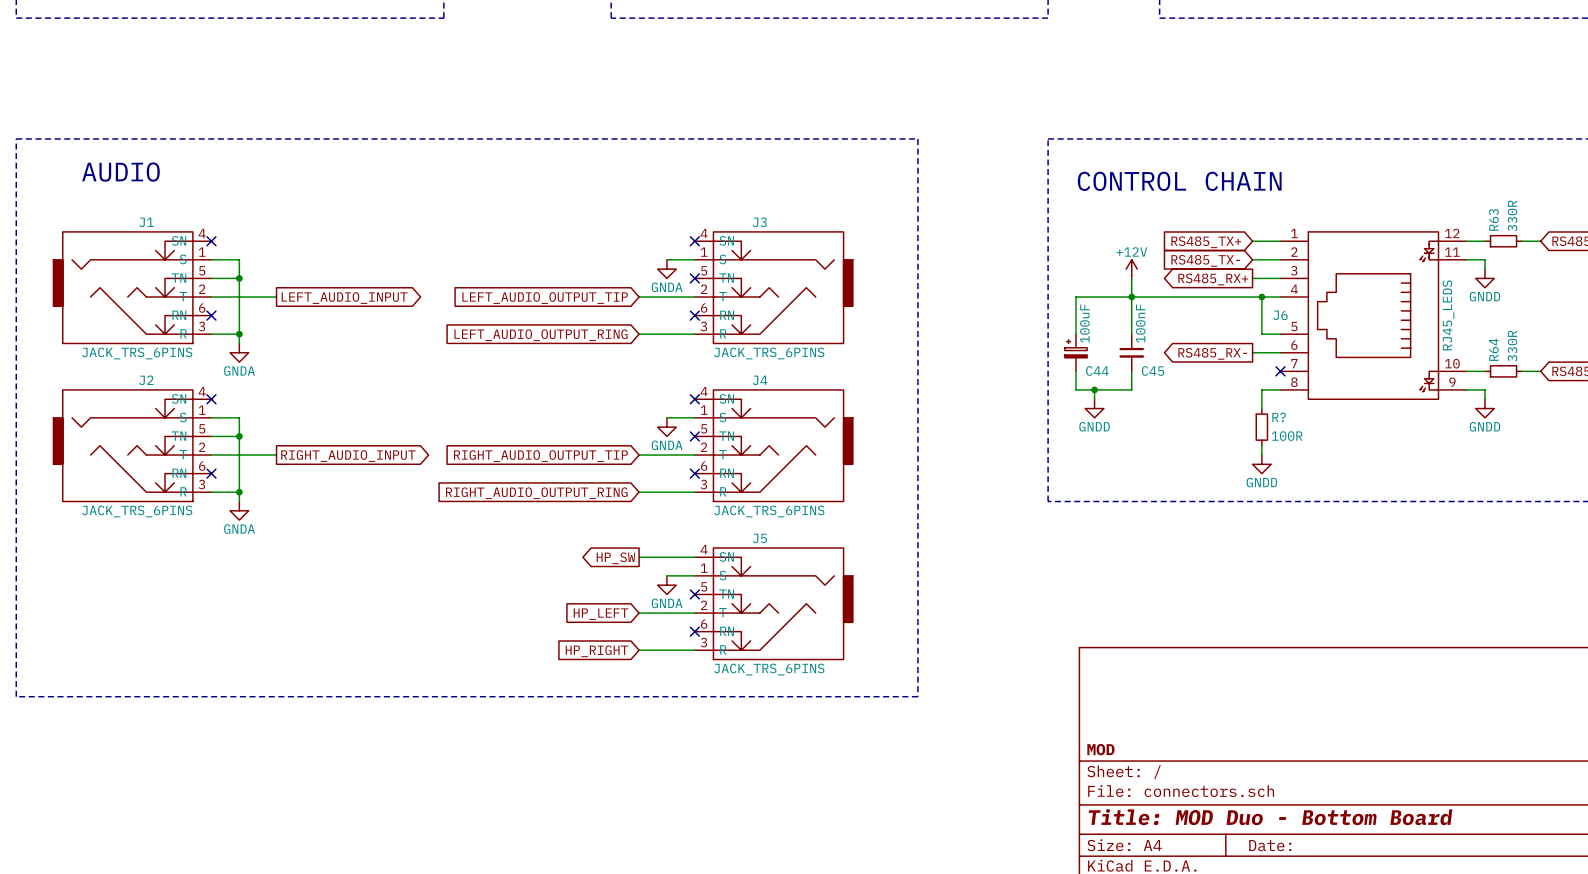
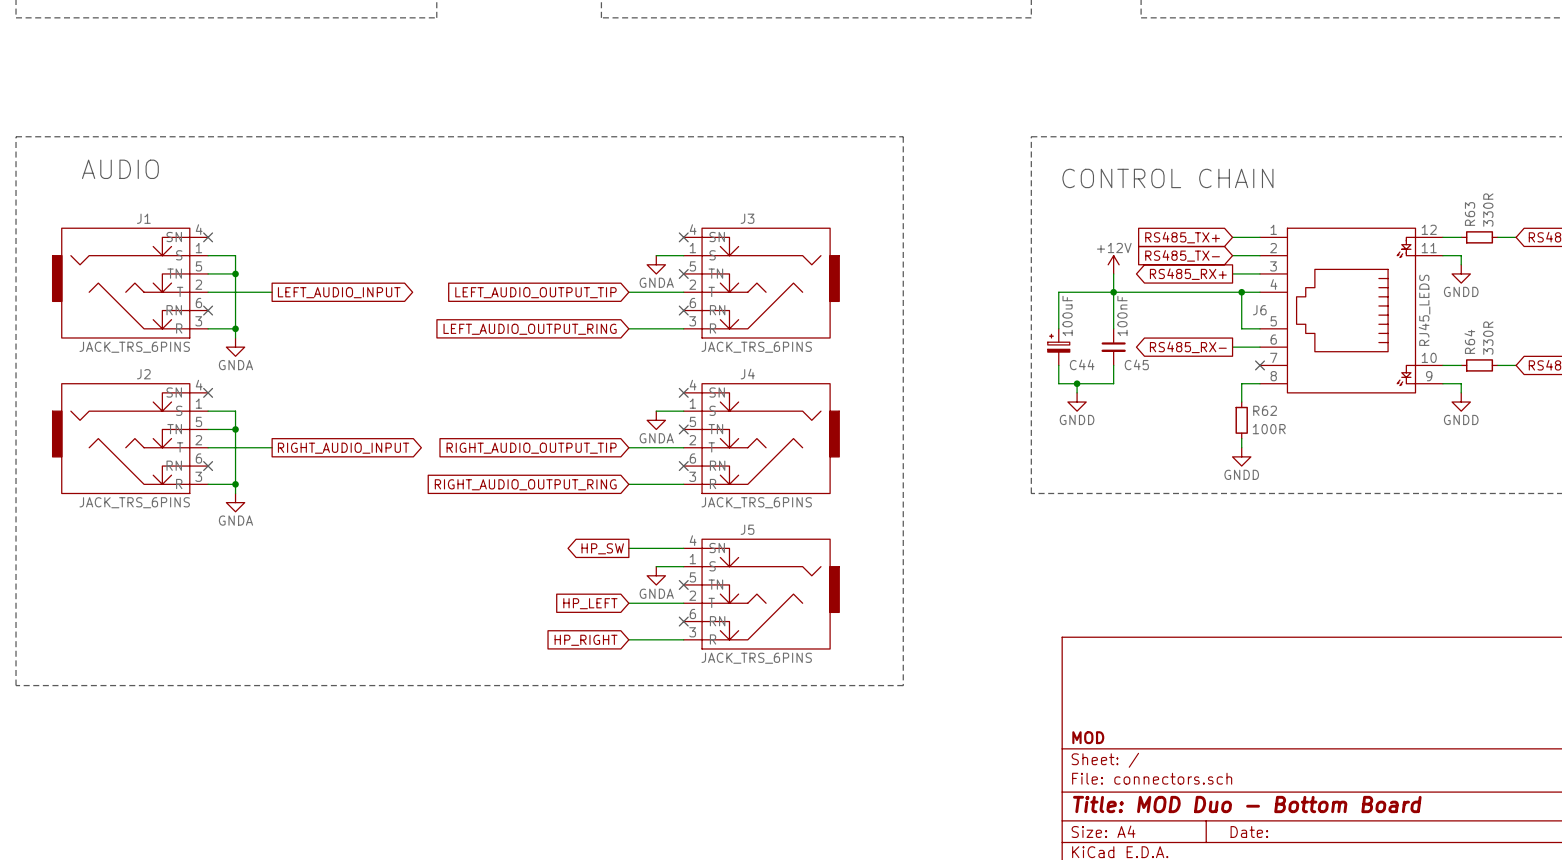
R? name: R? (1279, 417) -> R62 (1265, 410)

